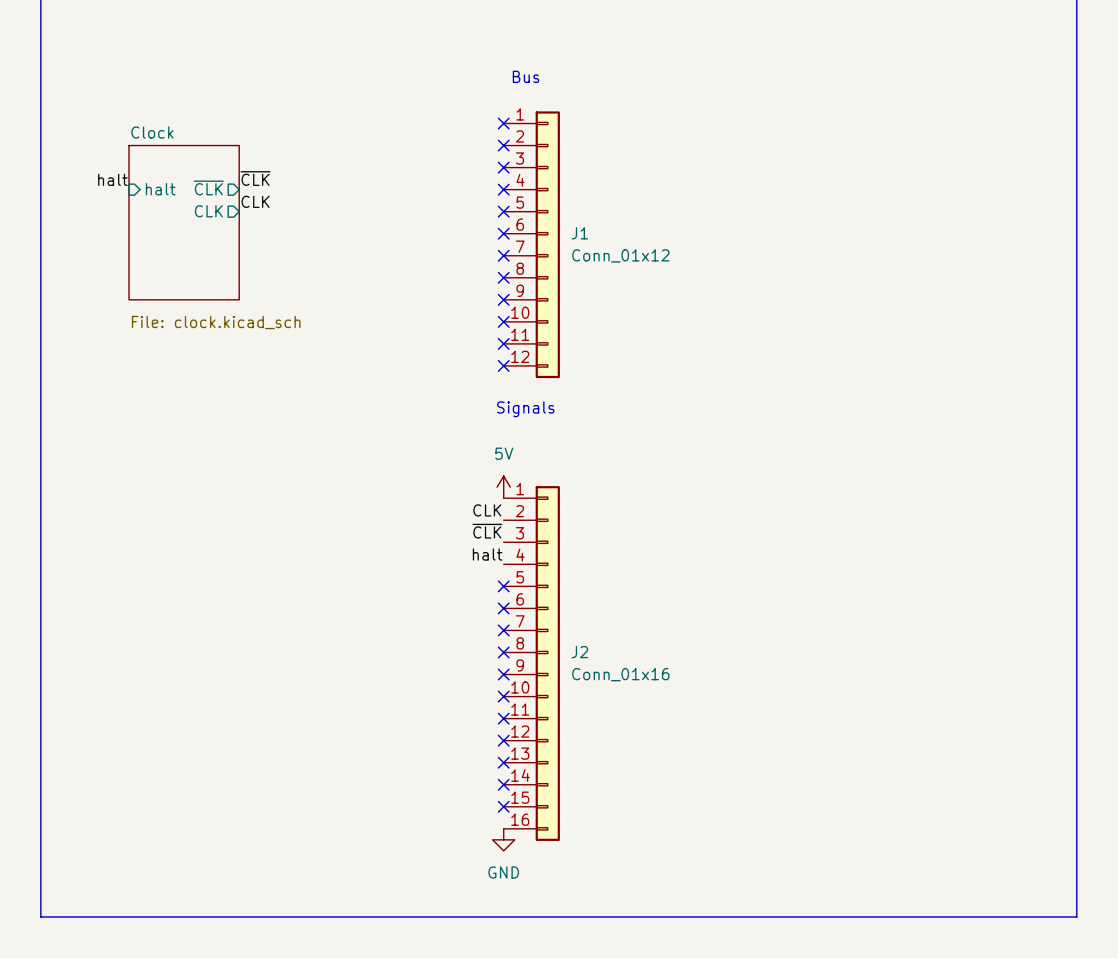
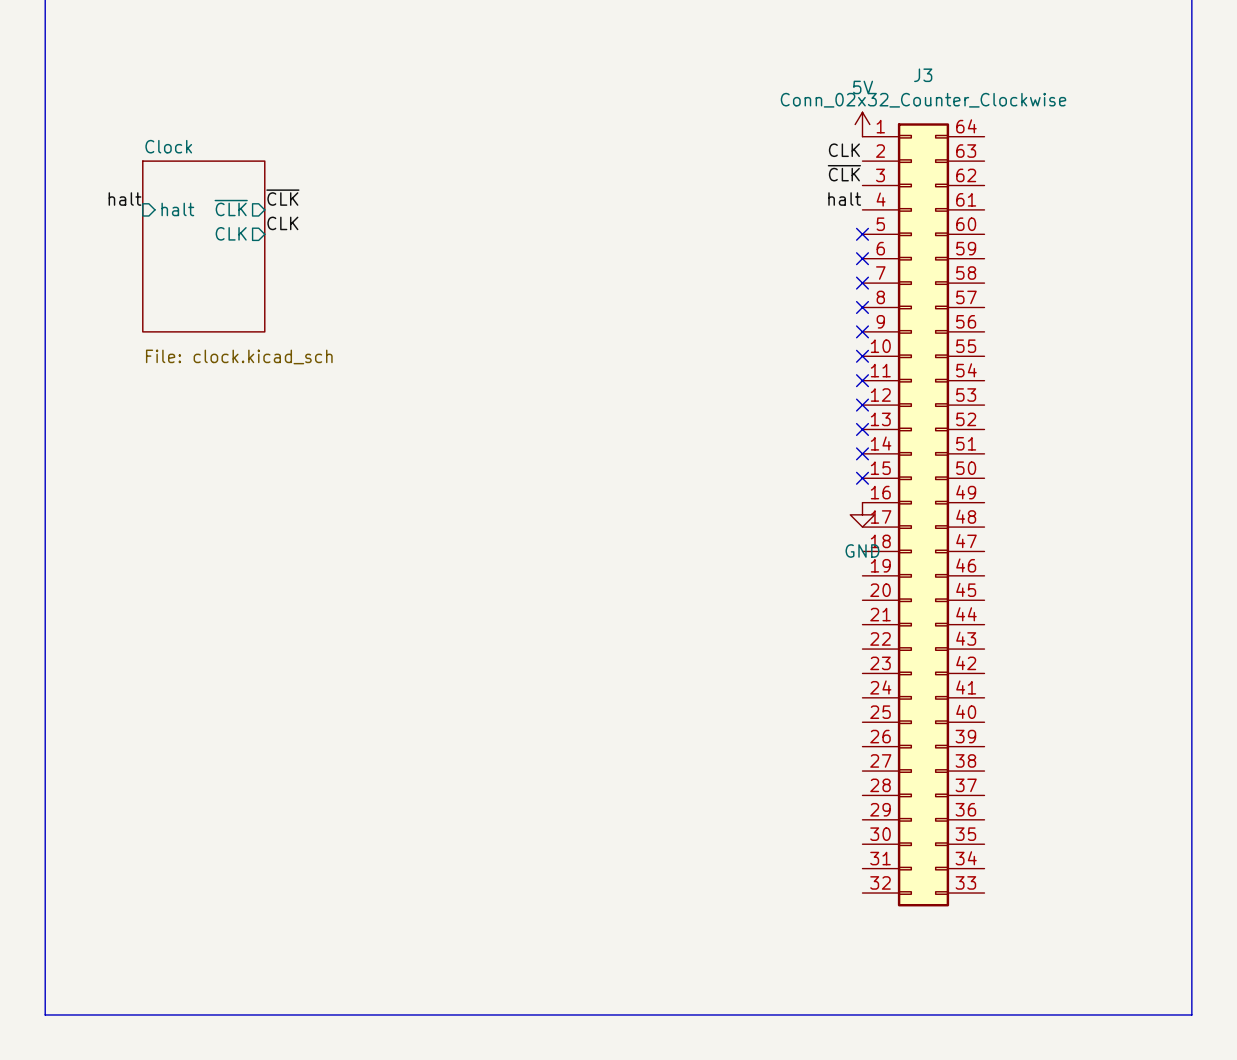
text: Bus (526, 76) -> none
power symbol: none -> 5V (862, 124)
no-connect mark: (503, 123) -> none
label: none -> CLK (844, 150)
no-connect mark: (503, 145) -> none
label: none -> ~{CLK} (844, 173)
no-connect mark: (503, 167) -> none
label: none -> halt (844, 199)
no-connect mark: (503, 189) -> none
no-connect mark: (503, 211) -> none
no-connect mark: none -> (862, 234)
no-connect mark: (503, 233) -> none
no-connect mark: none -> (862, 258)
J1: Conn_01x12 (531, 244) -> none
no-connect mark: (503, 255) -> none
no-connect mark: none -> (862, 283)
no-connect mark: (503, 277) -> none
no-connect mark: none -> (862, 307)
no-connect mark: (503, 299) -> none
no-connect mark: none -> (862, 331)
no-connect mark: (503, 321) -> none
no-connect mark: none -> (862, 356)
no-connect mark: (503, 343) -> none
no-connect mark: none -> (862, 380)
no-connect mark: (503, 365) -> none
no-connect mark: none -> (862, 405)
no-connect mark: none -> (862, 429)
text: Signals (525, 409) -> none
no-connect mark: none -> (862, 453)
no-connect mark: none -> (862, 478)
power symbol: none -> GND (862, 514)
J3: none -> Conn_02x32_Counter_Clockwise (923, 514)
power symbol: 5V (503, 487) -> none
label: CLK (487, 510) -> none
label: ~{CLK} (487, 531) -> none
label: halt (487, 554) -> none
no-connect mark: (503, 586) -> none
no-connect mark: (503, 608) -> none
no-connect mark: (503, 630) -> none
no-connect mark: (503, 652) -> none
J2: Conn_01x16 (531, 663) -> none
no-connect mark: (503, 674) -> none
no-connect mark: (503, 696) -> none
no-connect mark: (503, 718) -> none
no-connect mark: (503, 740) -> none
no-connect mark: (503, 762) -> none
no-connect mark: (503, 784) -> none
no-connect mark: (503, 806) -> none
power symbol: GND (503, 839) -> none

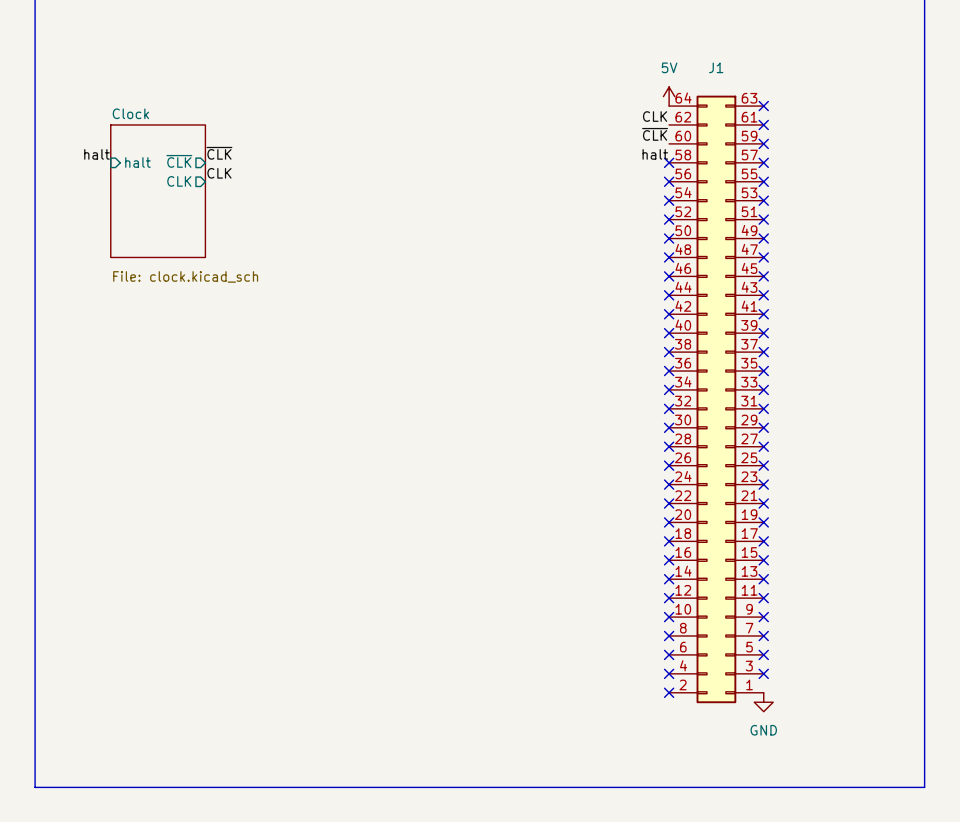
J3 name: J3 (923, 75) -> J1 (716, 67)
J3 value: Conn_02x32_Counter_Clockwise (923, 100) -> none
J3 symbol: [862, 123, 985, 907] -> [669, 95, 764, 704]
no-connect mark: none -> (763, 106)
no-connect mark: none -> (763, 124)
no-connect mark: none -> (763, 143)
no-connect mark: none -> (669, 162)
no-connect mark: none -> (763, 162)
no-connect mark: none -> (763, 181)
no-connect mark: none -> (763, 200)
no-connect mark: none -> (763, 219)
no-connect mark: none -> (763, 238)
no-connect mark: none -> (763, 257)
no-connect mark: none -> (763, 276)
no-connect mark: none -> (763, 295)
no-connect mark: none -> (763, 314)
no-connect mark: none -> (763, 333)
no-connect mark: none -> (763, 352)
no-connect mark: none -> (763, 371)
no-connect mark: none -> (669, 389)
no-connect mark: none -> (763, 389)
power symbol: GND (862, 514) -> none
no-connect mark: none -> (669, 408)
no-connect mark: none -> (763, 408)
no-connect mark: none -> (669, 427)
no-connect mark: none -> (763, 427)
no-connect mark: none -> (669, 446)
no-connect mark: none -> (763, 446)
no-connect mark: none -> (669, 465)
no-connect mark: none -> (763, 465)
no-connect mark: none -> (669, 484)
no-connect mark: none -> (763, 484)
no-connect mark: none -> (669, 503)
no-connect mark: none -> (763, 503)
no-connect mark: none -> (669, 522)
no-connect mark: none -> (763, 522)
no-connect mark: none -> (669, 541)
no-connect mark: none -> (763, 541)
no-connect mark: none -> (669, 560)
no-connect mark: none -> (763, 560)
no-connect mark: none -> (669, 579)
no-connect mark: none -> (763, 579)
no-connect mark: none -> (669, 598)
no-connect mark: none -> (763, 598)
no-connect mark: none -> (669, 617)
no-connect mark: none -> (763, 617)
no-connect mark: none -> (669, 635)
no-connect mark: none -> (763, 635)
no-connect mark: none -> (669, 654)
no-connect mark: none -> (763, 654)
no-connect mark: none -> (669, 673)
no-connect mark: none -> (763, 673)
no-connect mark: none -> (669, 692)
power symbol: none -> GND (763, 702)

